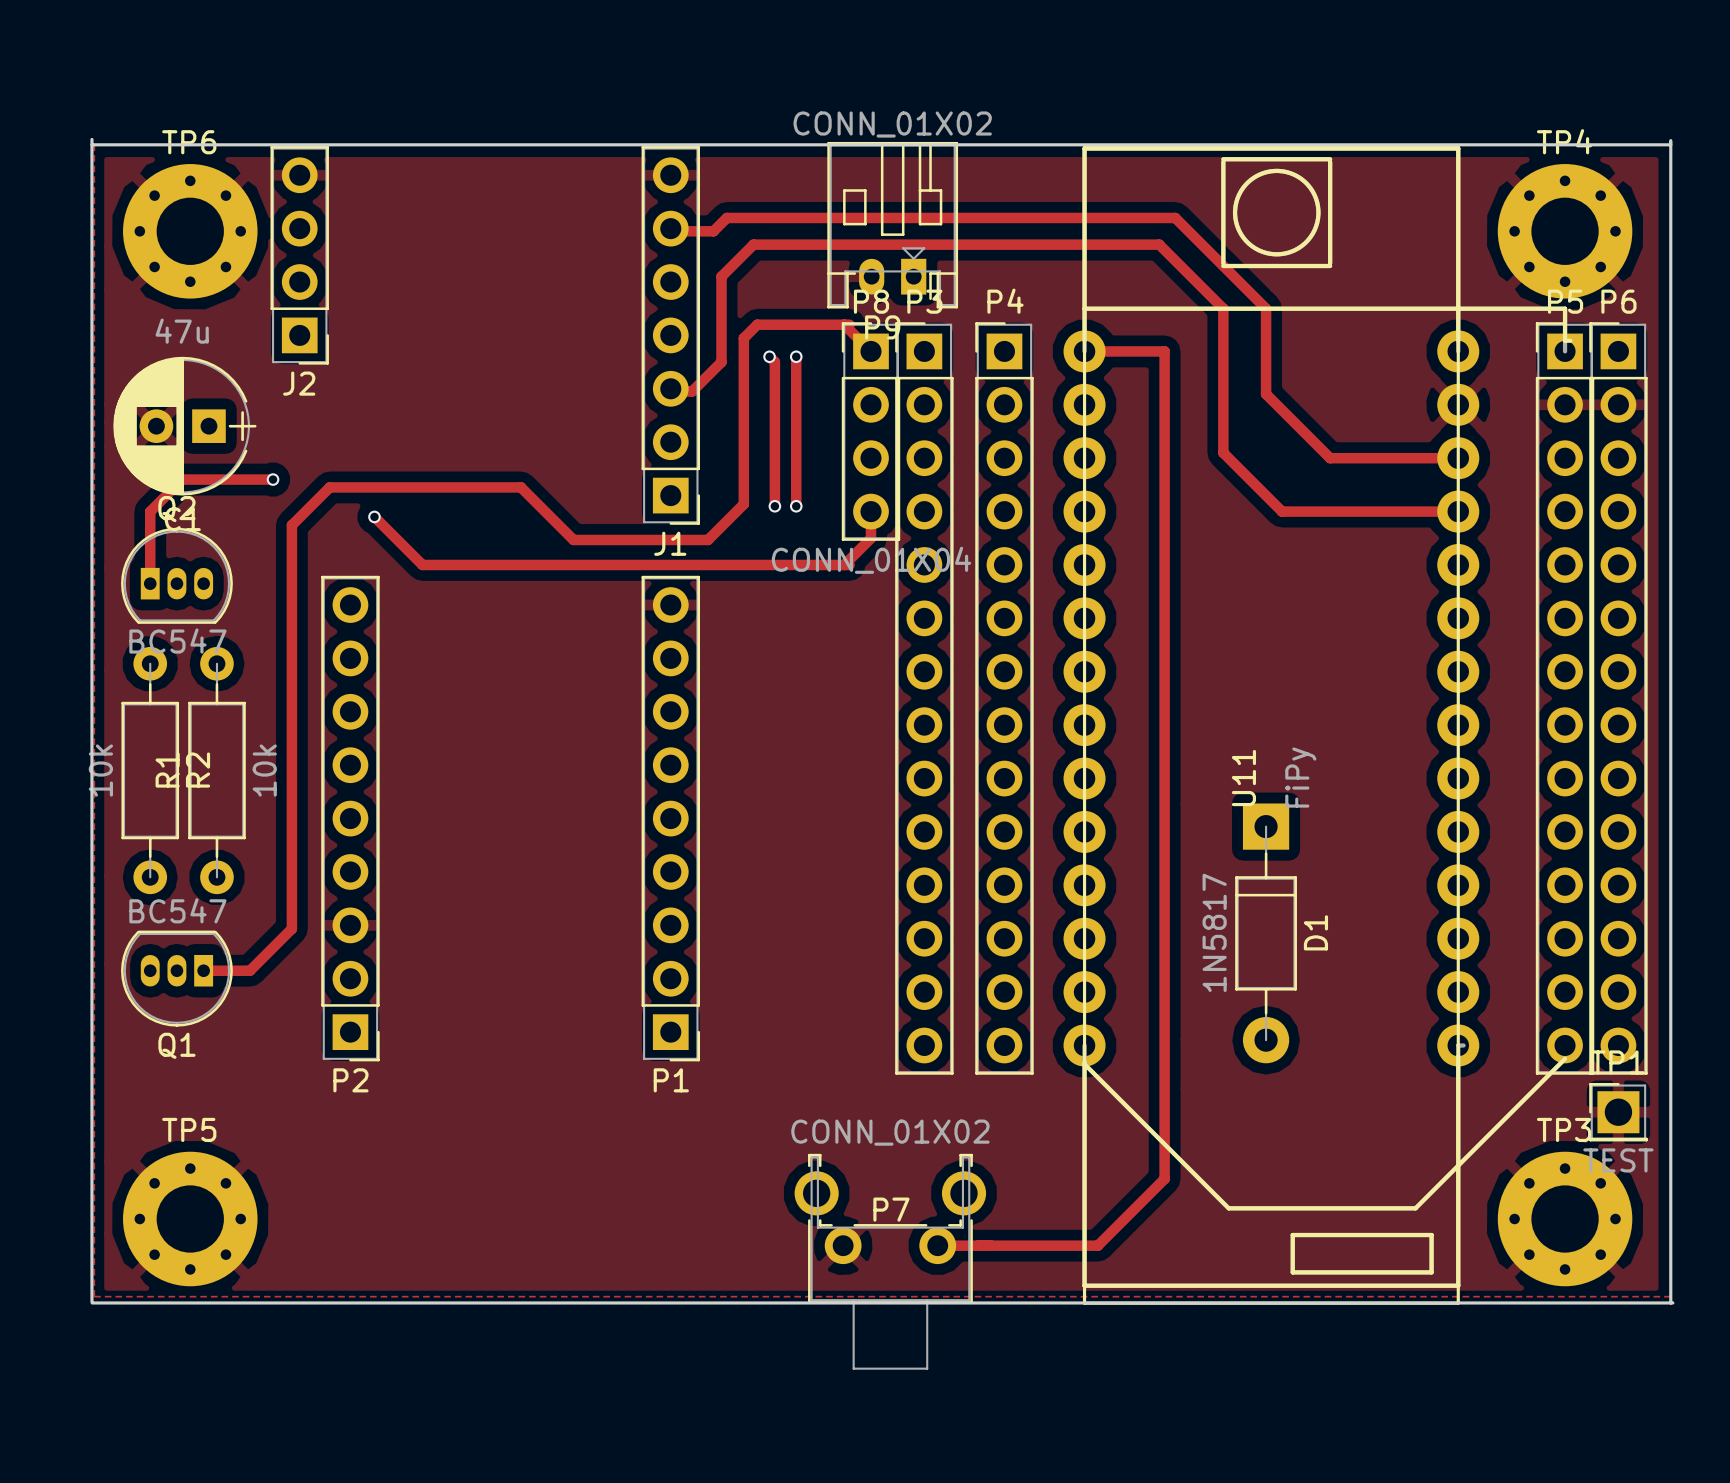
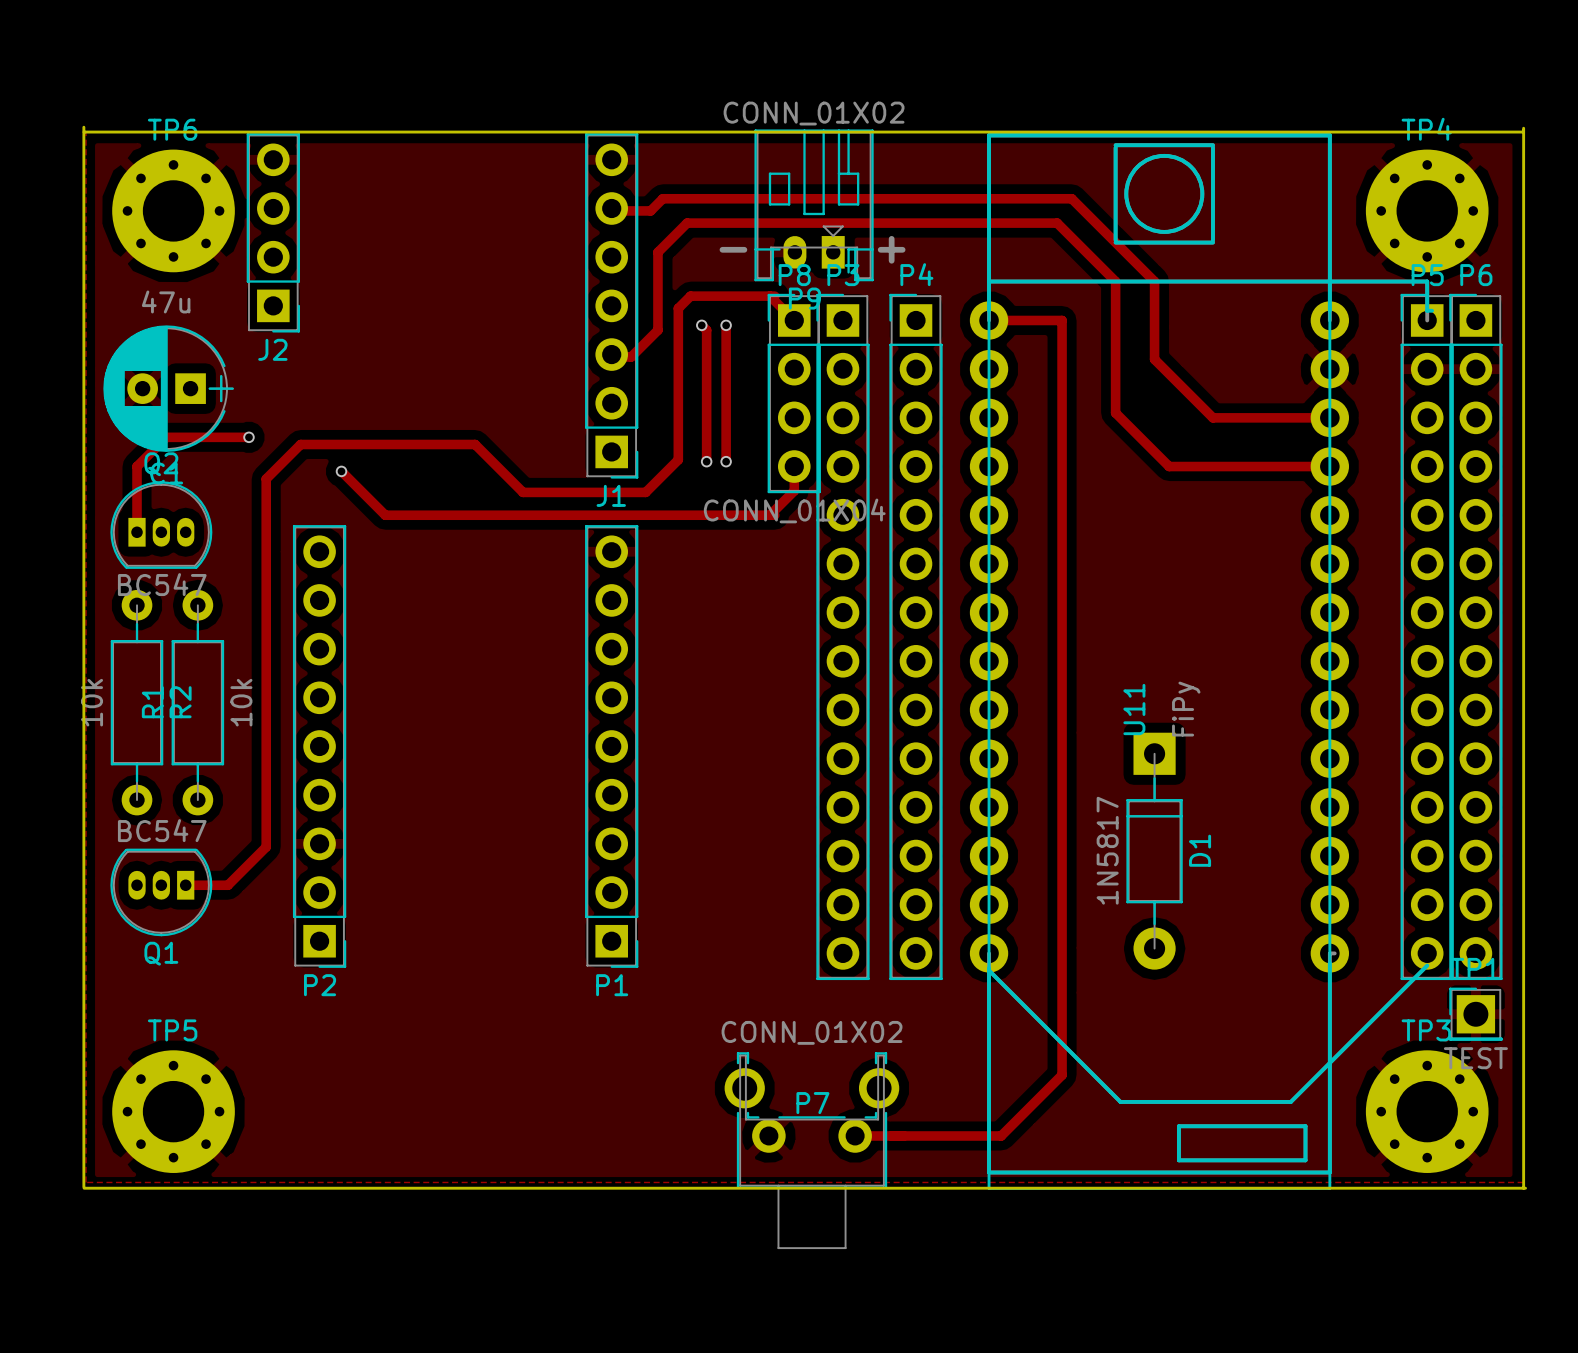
text: none -> - (733, 249)
text: none -> + (891, 249)

